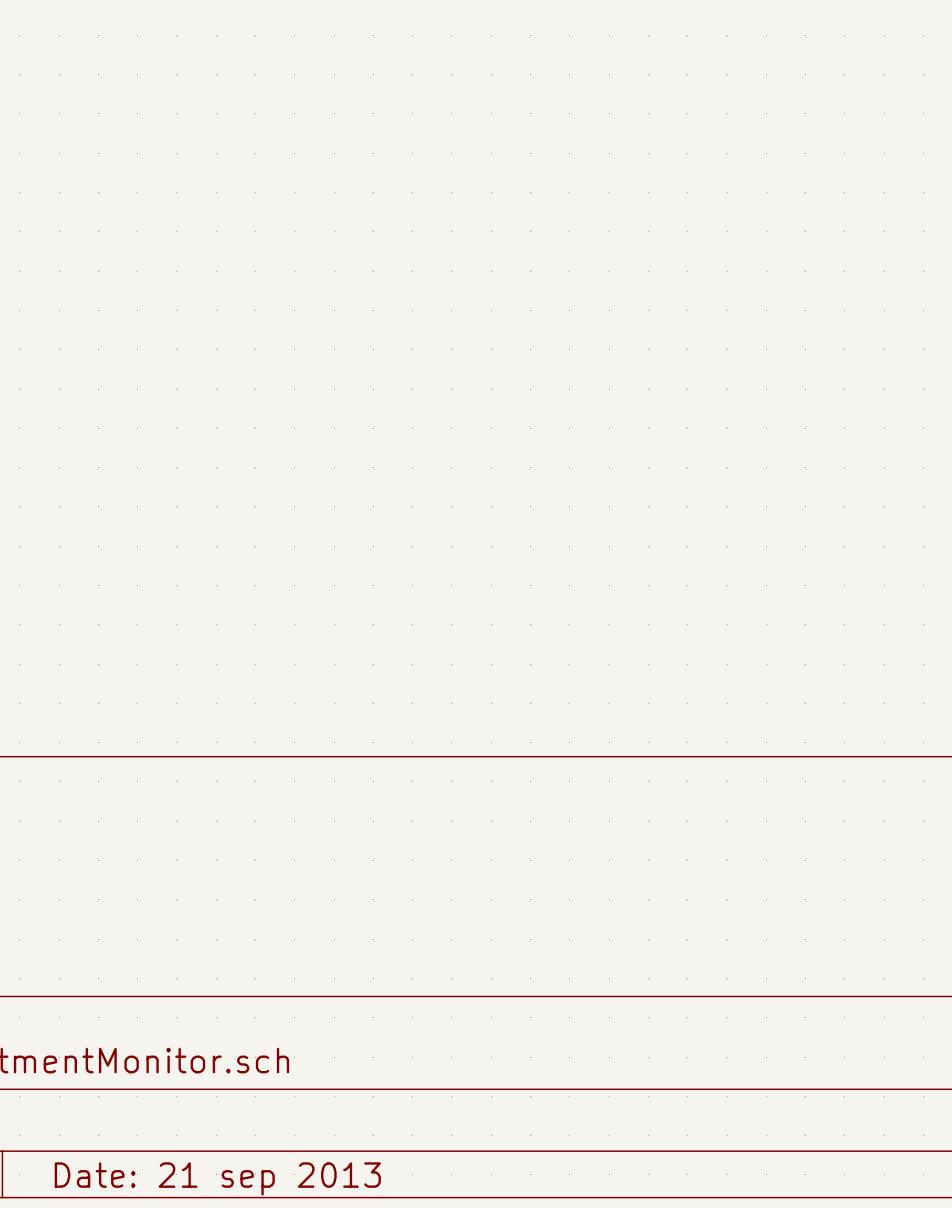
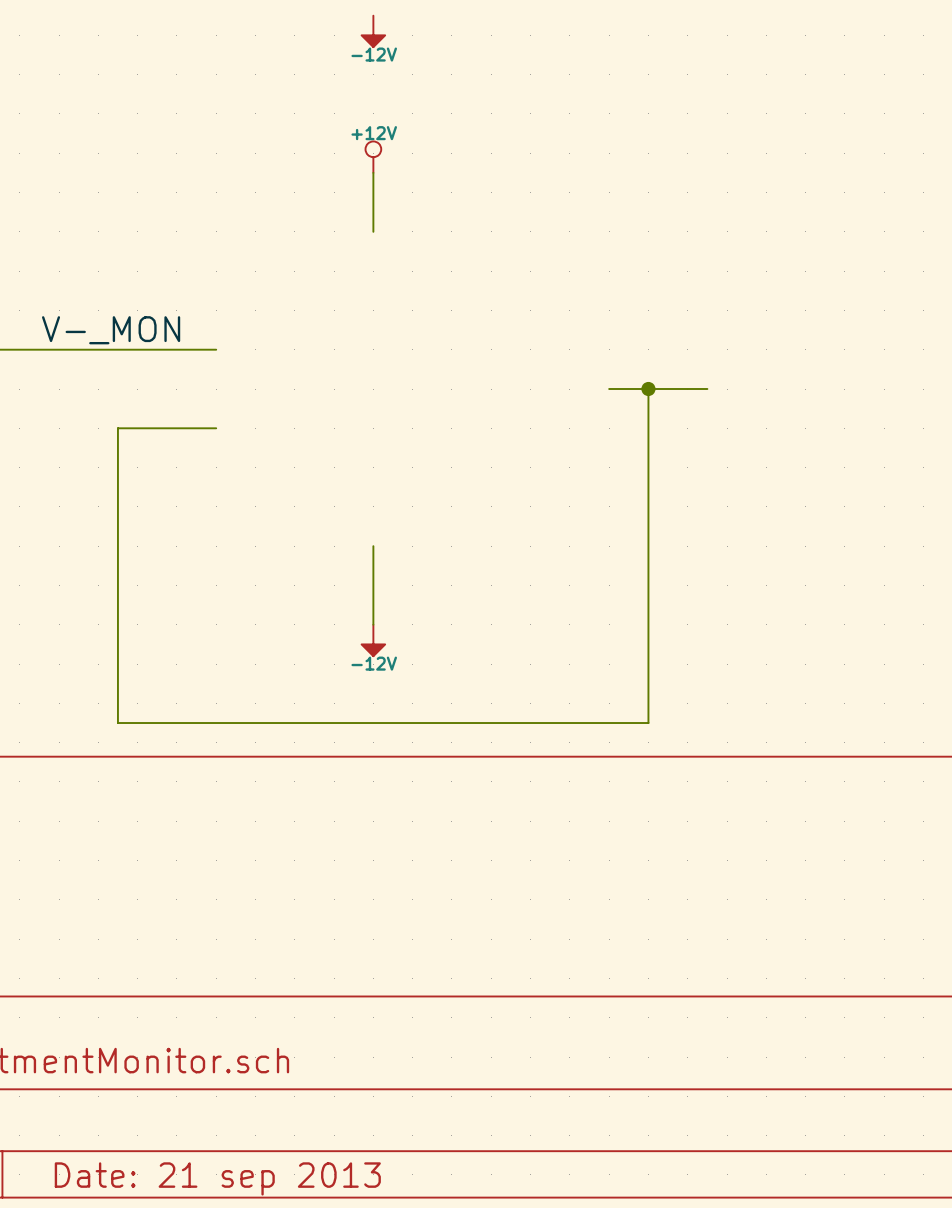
power symbol: none -> -12V (373, 31)
power symbol: none -> +12V (373, 157)
wire: none -> (373, 172) (373, 231)
label: none -> V-_MON (111, 330)
wire: none -> (0, 349) (216, 349)
wire: none -> (609, 389) (707, 389)
wire: none -> (648, 389) (648, 723) (117, 723) (117, 428) (216, 428)
junction: none -> (648, 389)
wire: none -> (373, 546) (373, 624)
power symbol: none -> -12V (373, 640)

